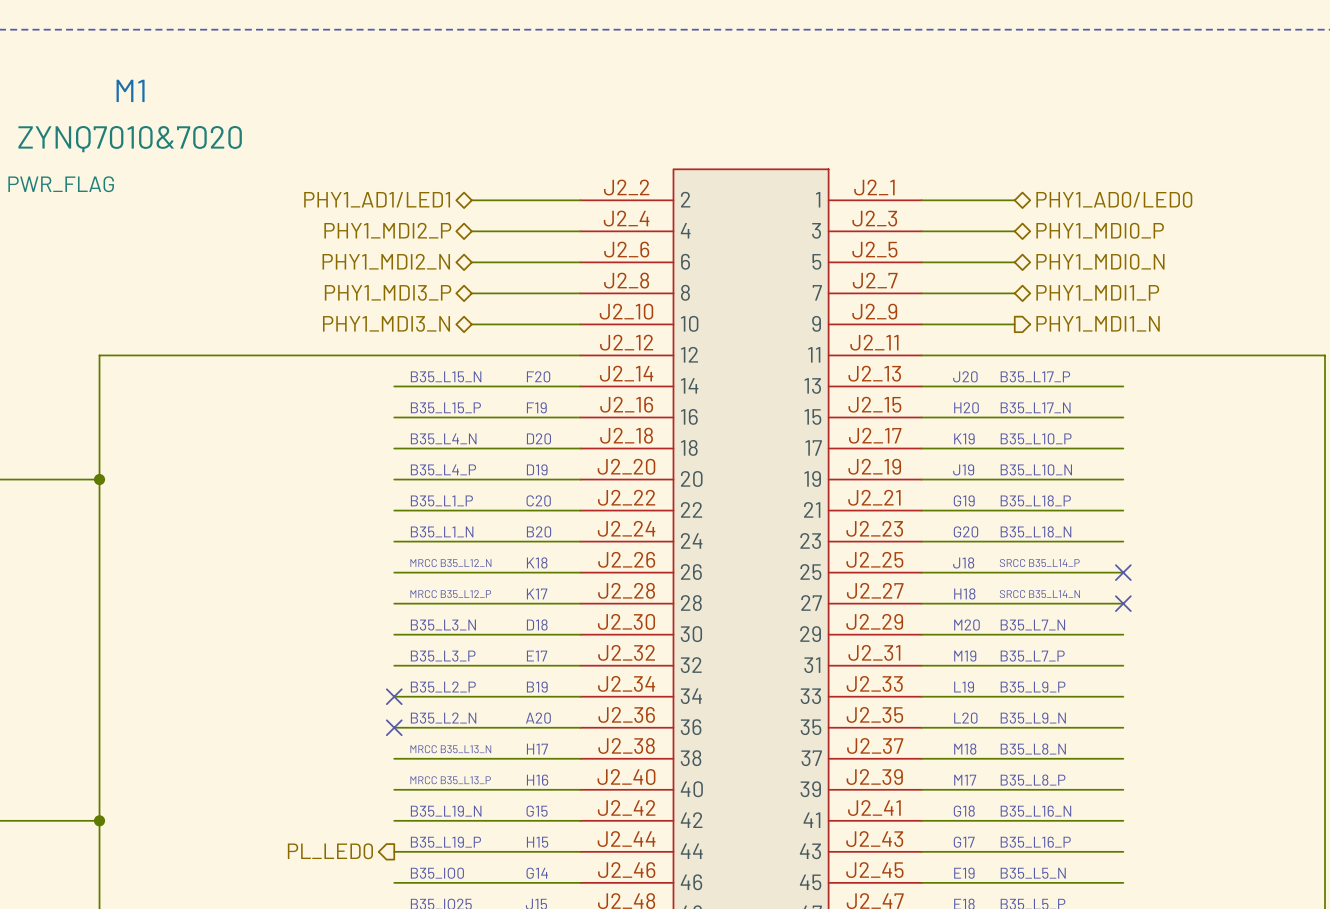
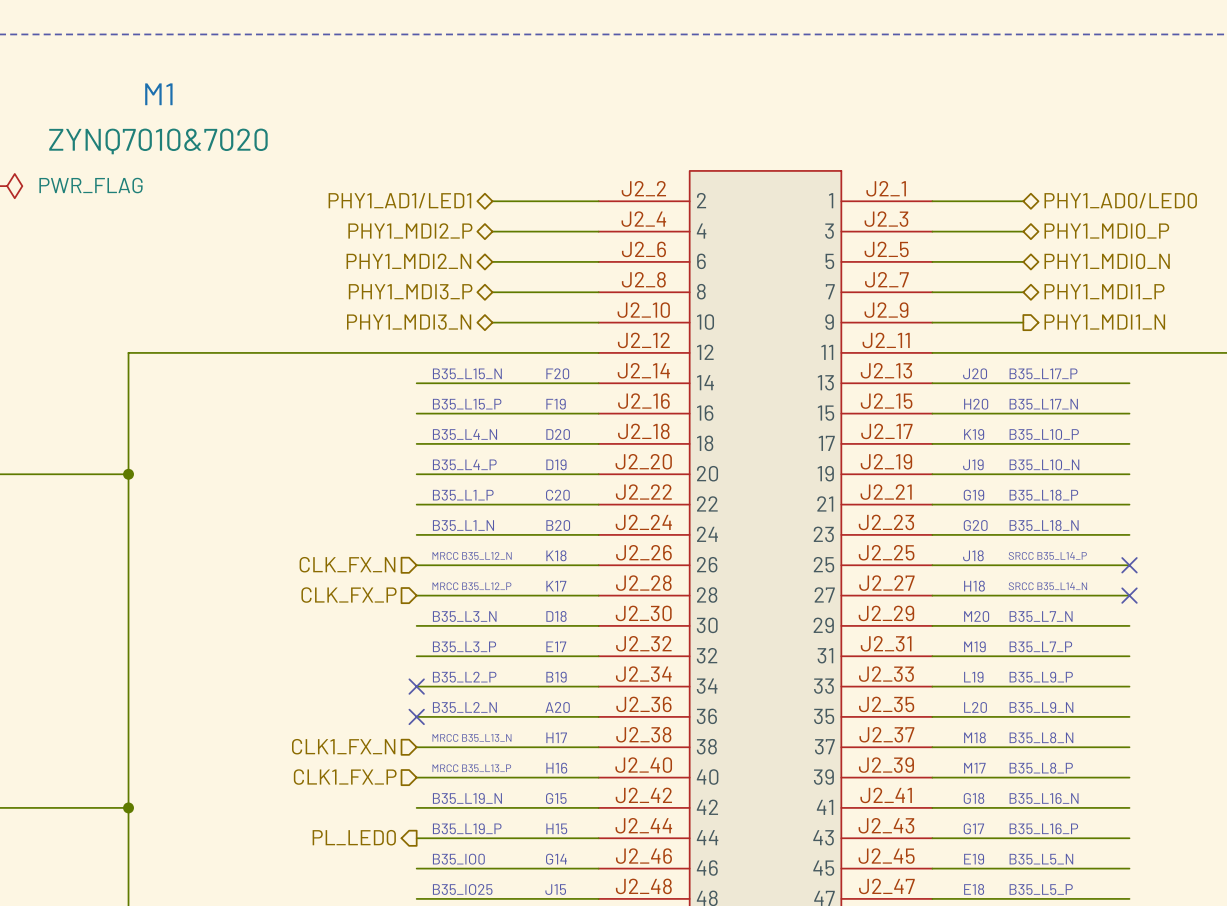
hierarchical label: none -> CLK_FX_N (347, 564)
hierarchical label: none -> CLK_FX_P (349, 595)
hierarchical label: none -> CLK1_FX_N (343, 746)
hierarchical label: none -> CLK1_FX_P (345, 777)

